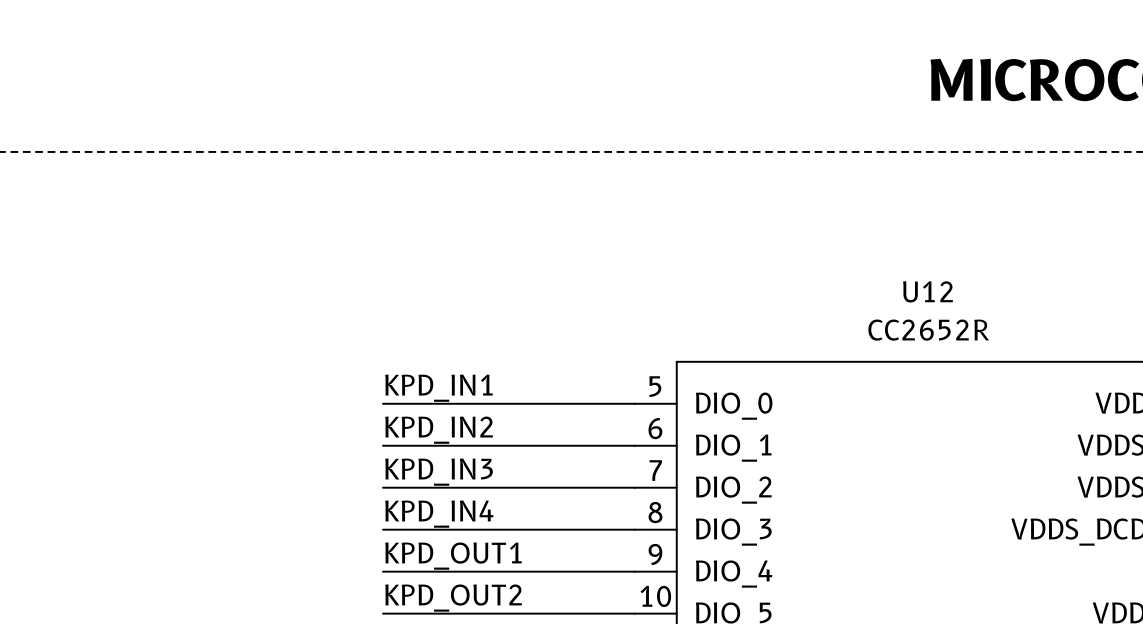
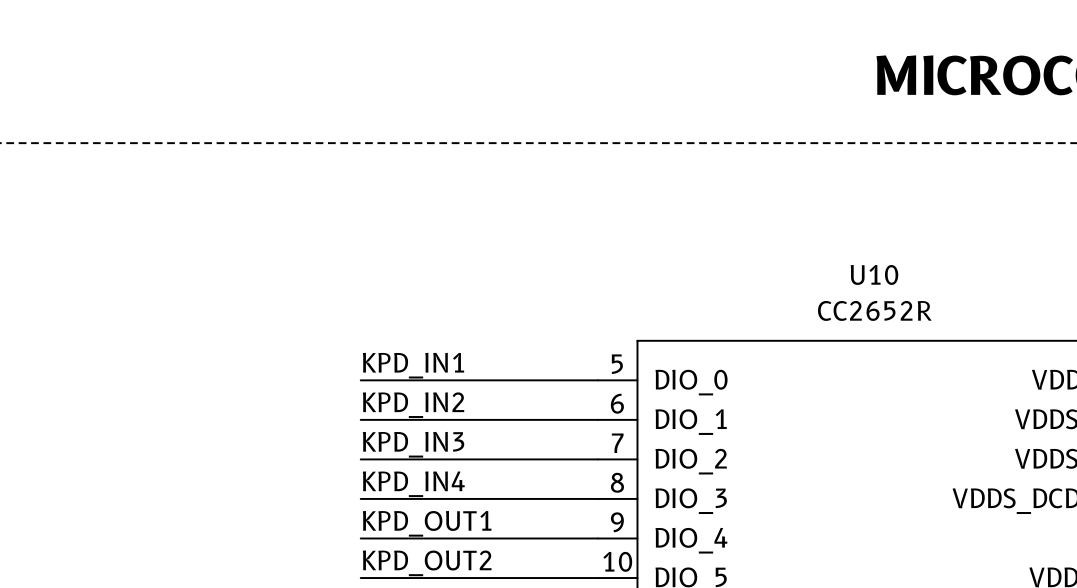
U12 name: U12 (927, 291) -> U10 (874, 274)

